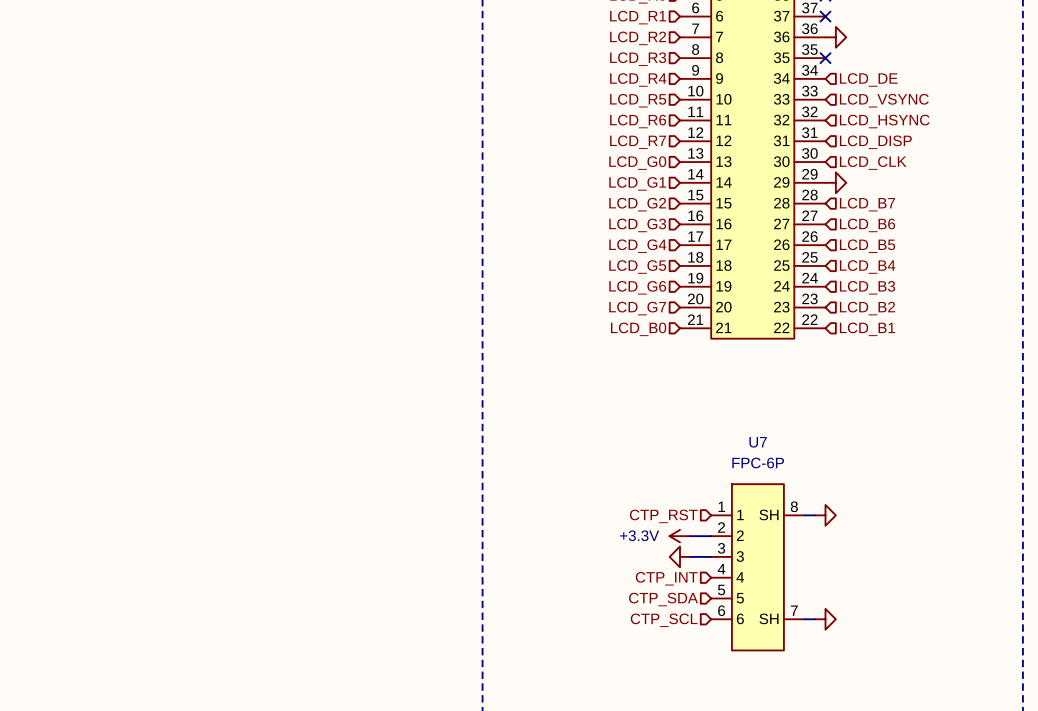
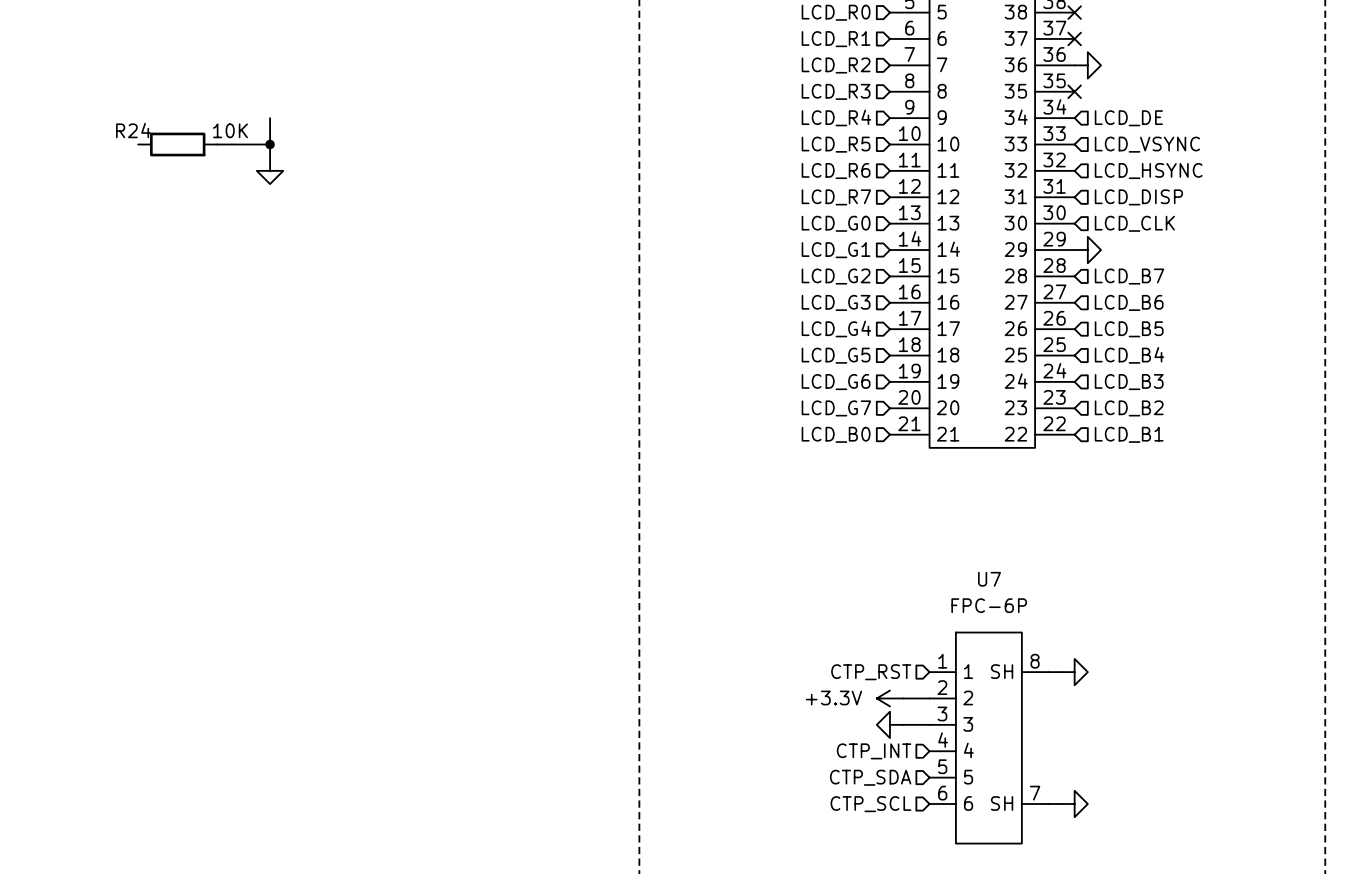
wire: none -> (270, 118) (270, 157)
R24: none -> 10K (177, 144)
wire: none -> (217, 144) (270, 144)
junction: none -> (270, 144)
power symbol: none -> (270, 170)

